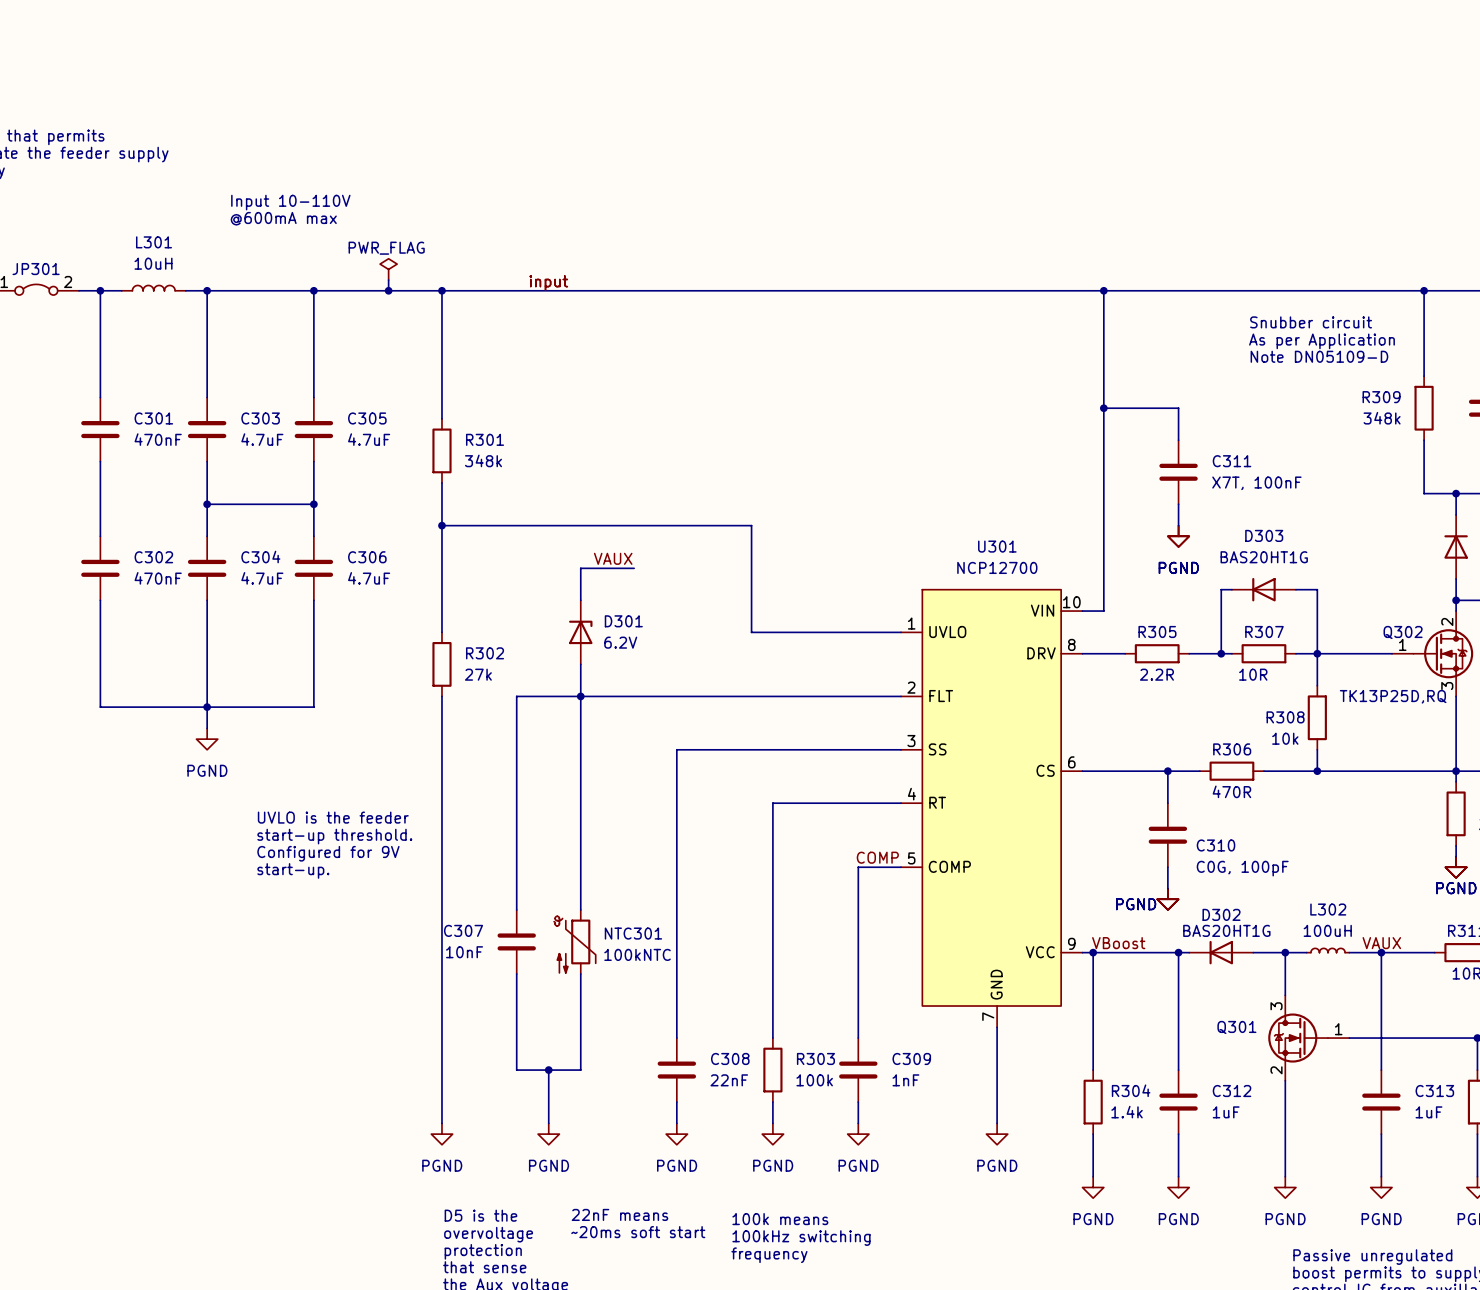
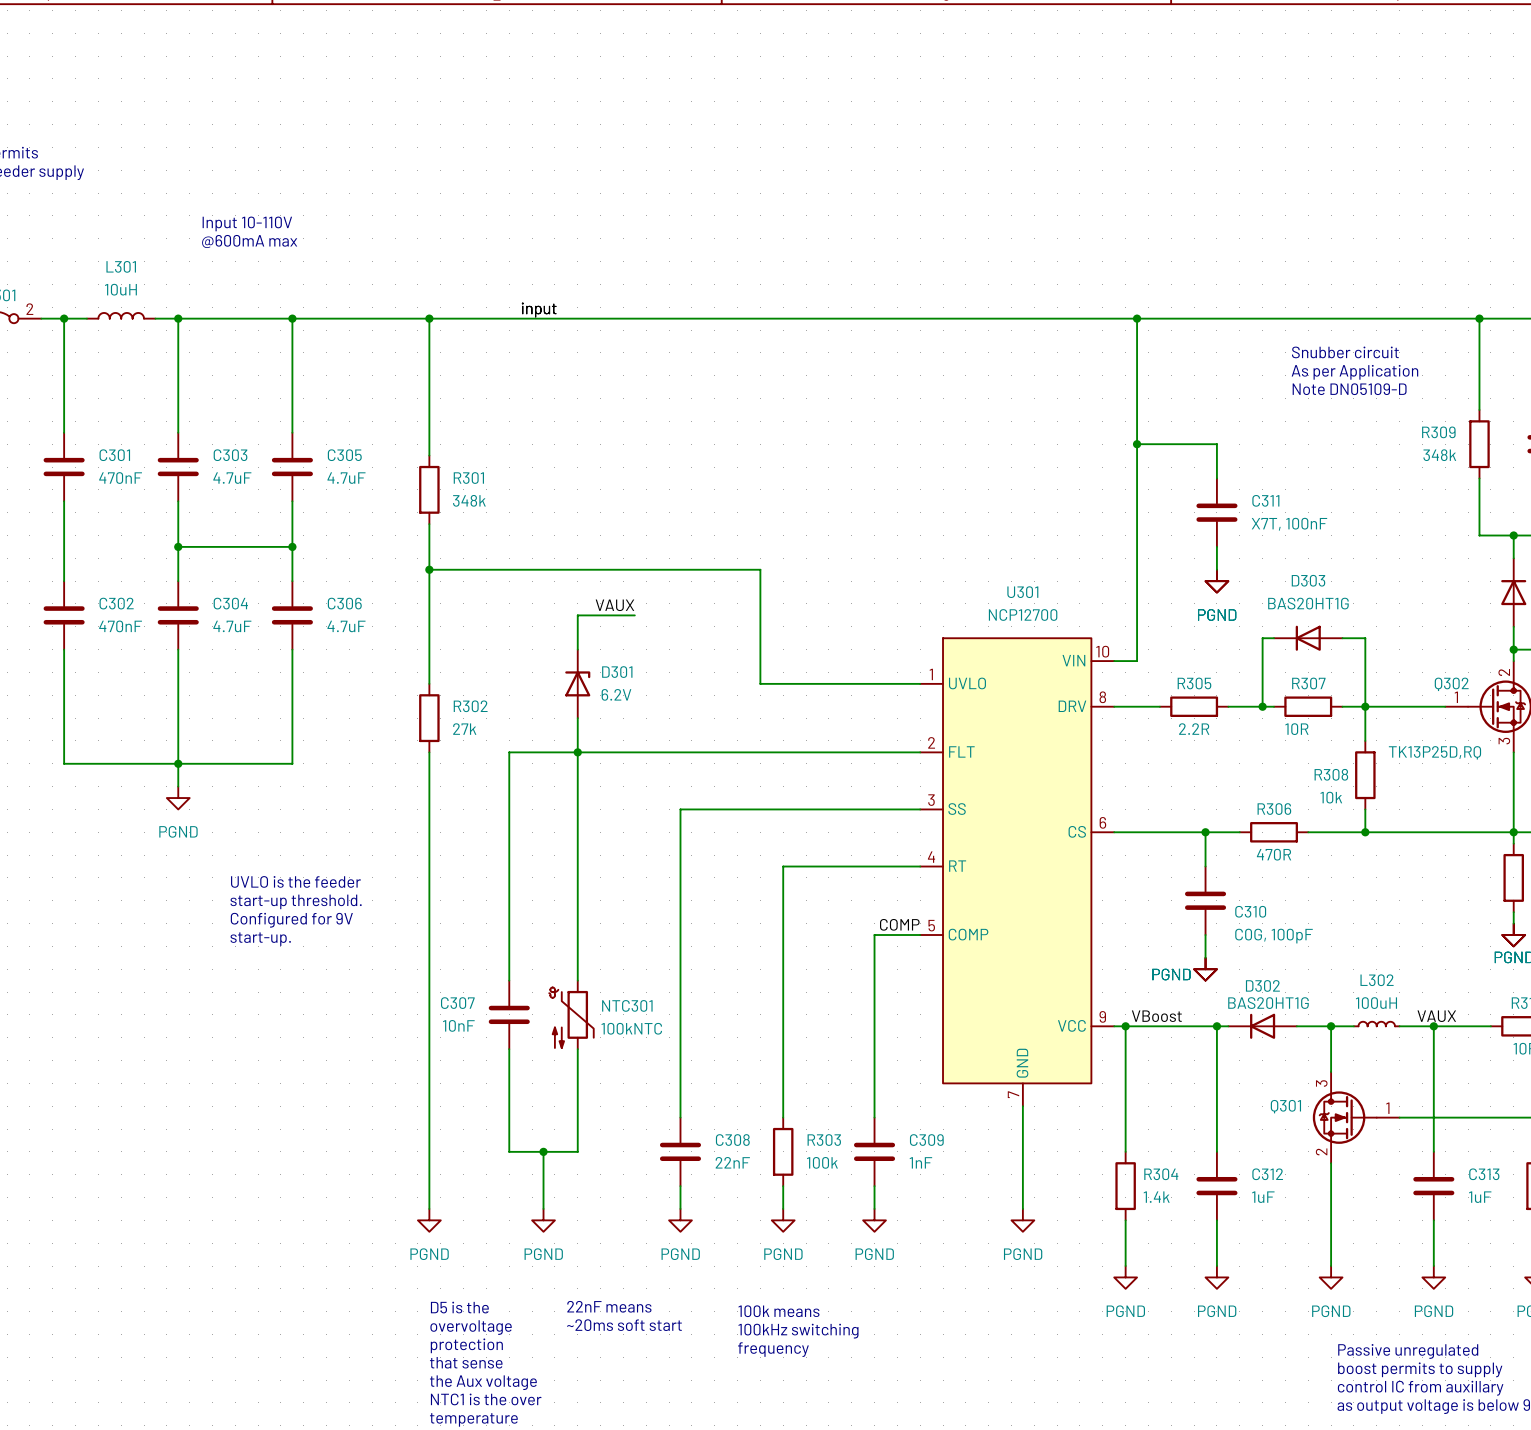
power symbol: PWR_FLAG (388, 269) -> none
wire: (388, 280) (388, 290) -> none
junction: (388, 290) -> none

